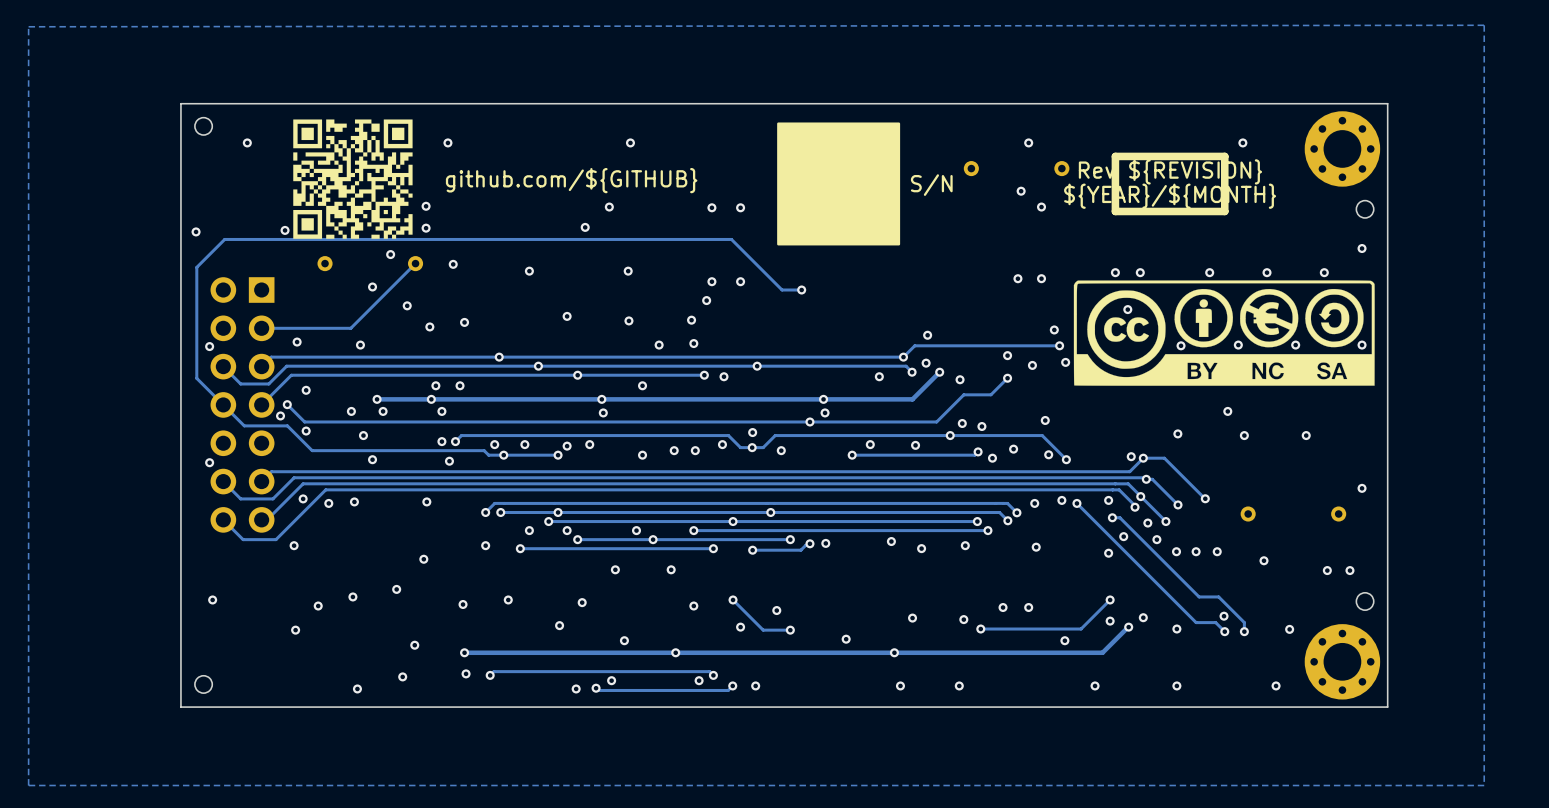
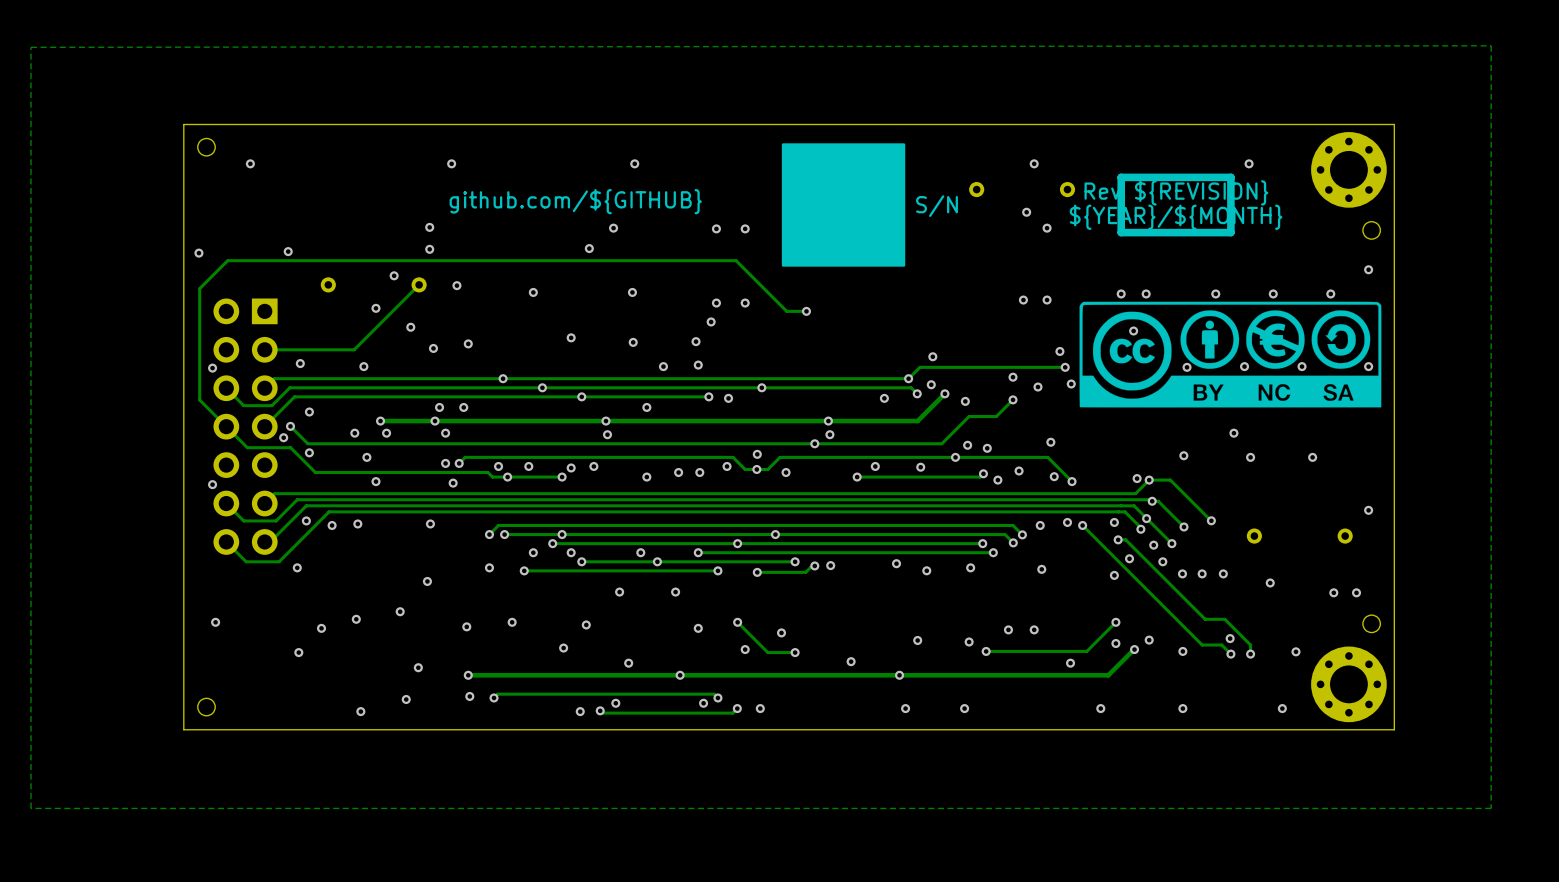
drawing: [293, 119, 413, 239] -> none

